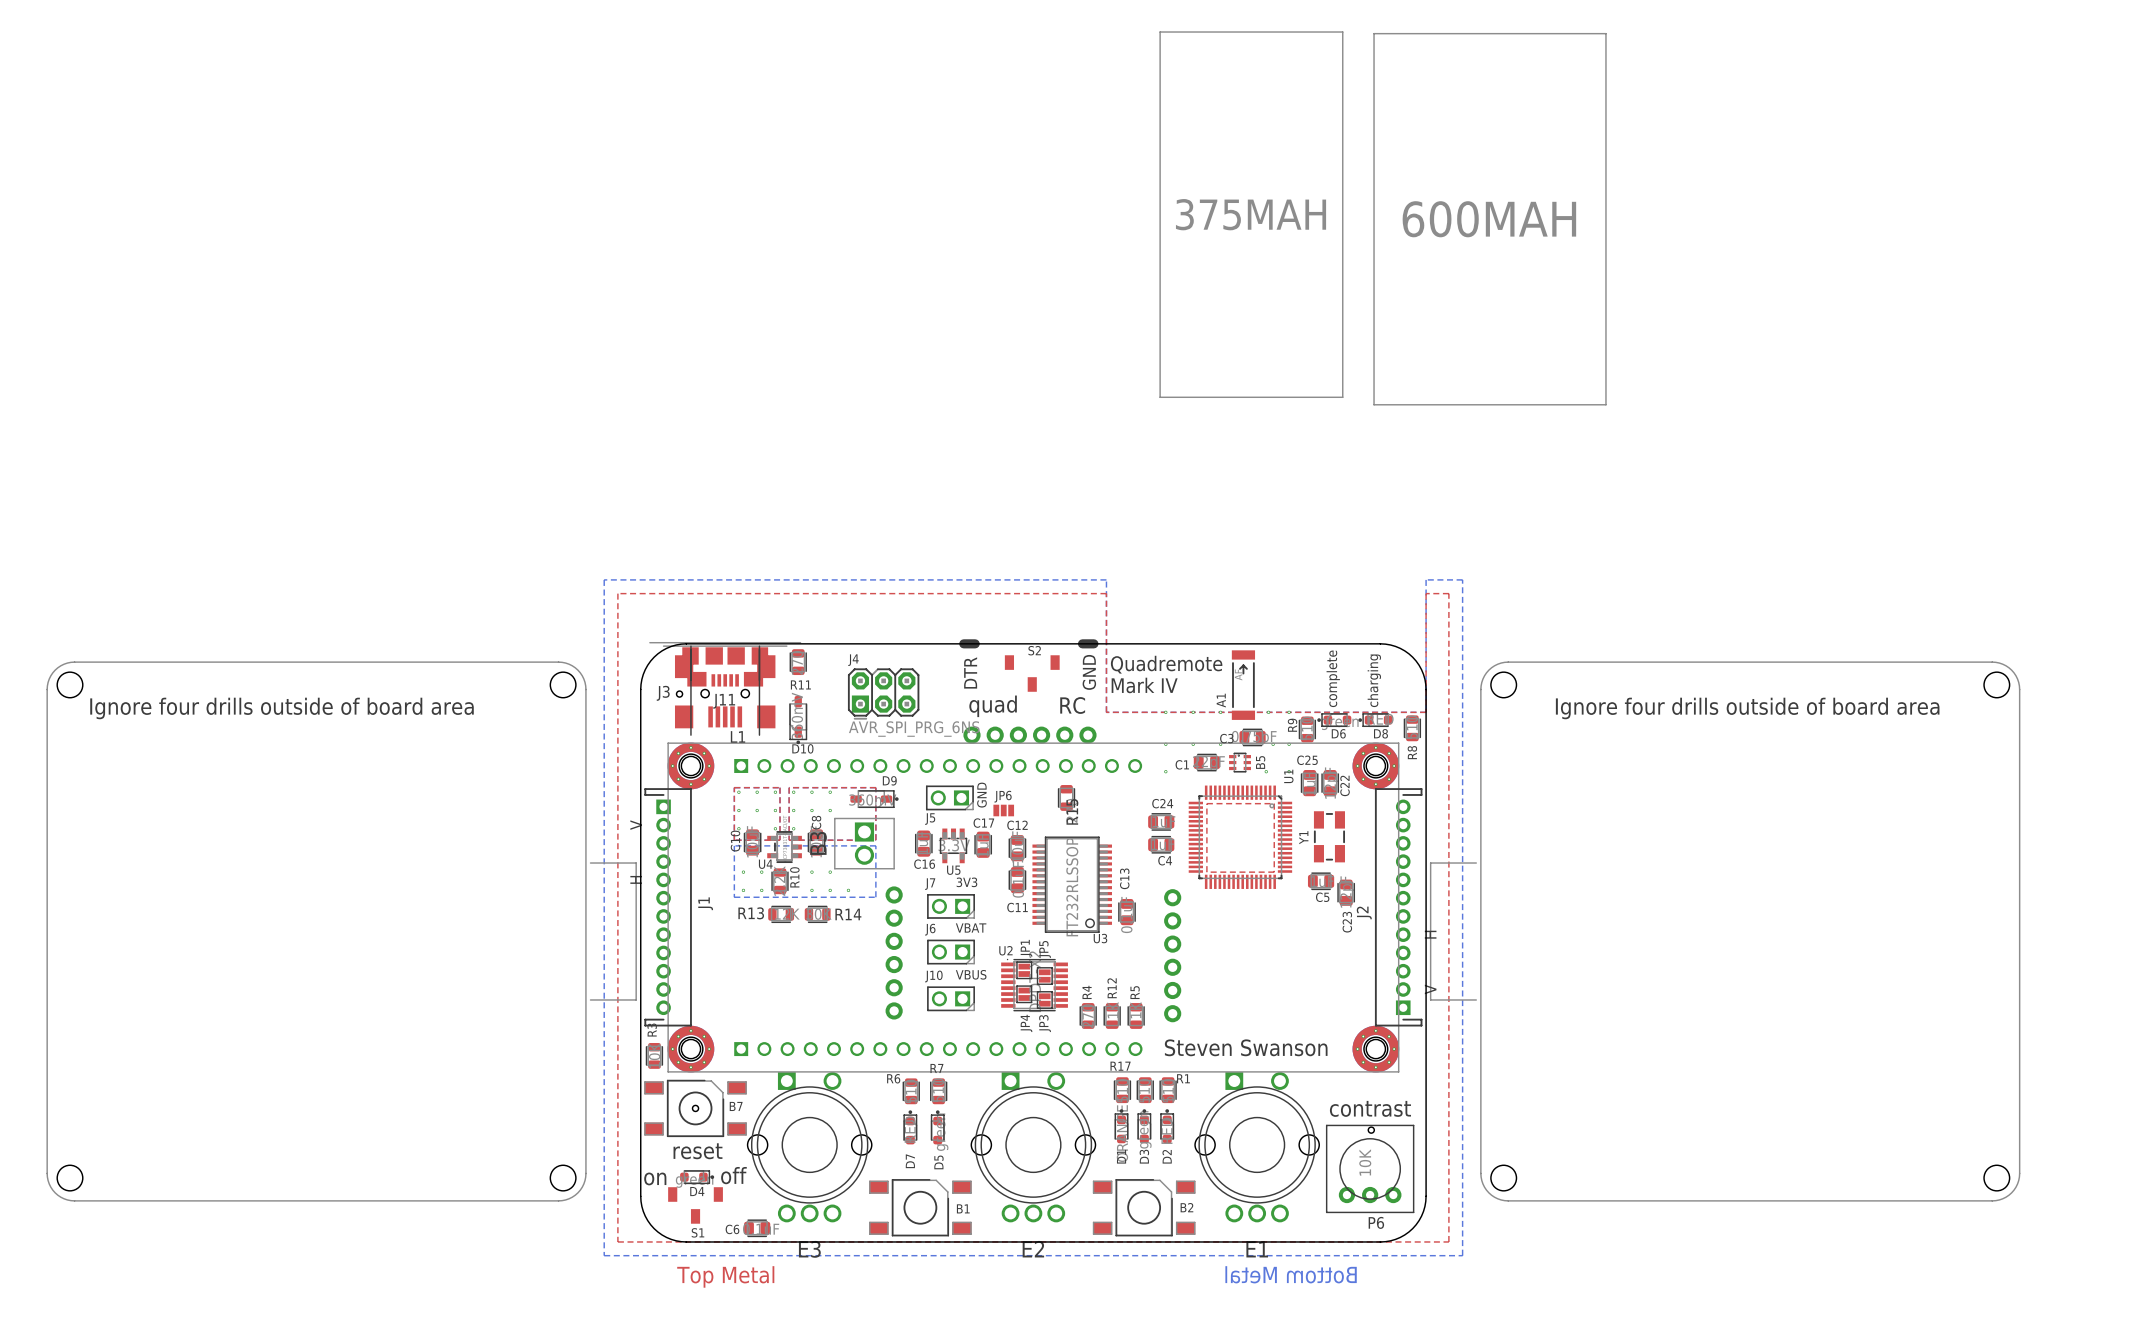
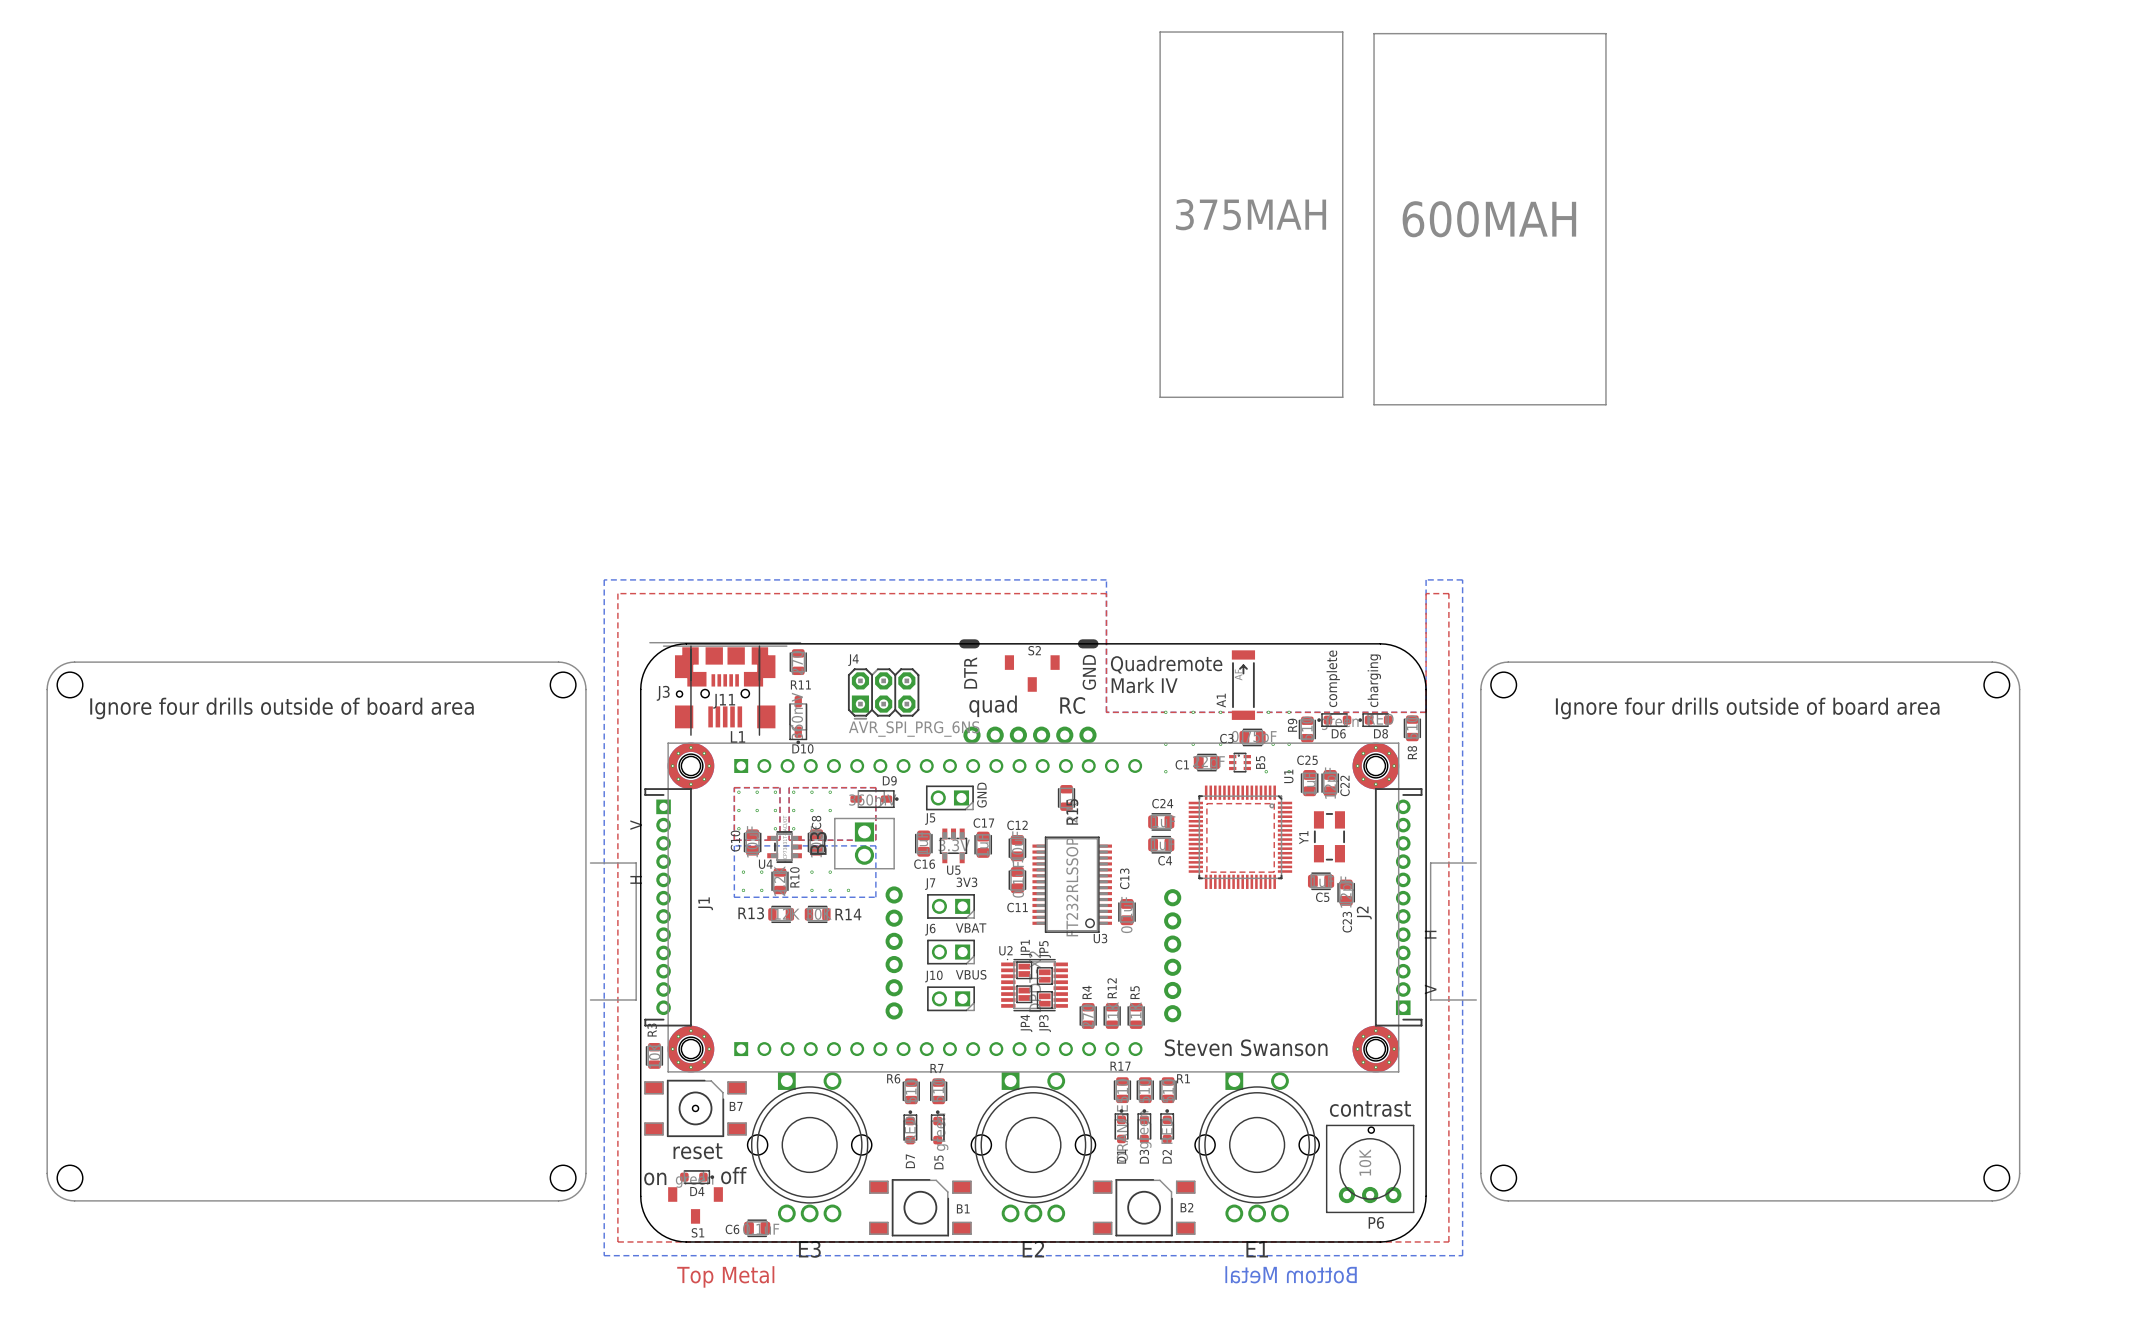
JP6: (1003, 810) -> none

